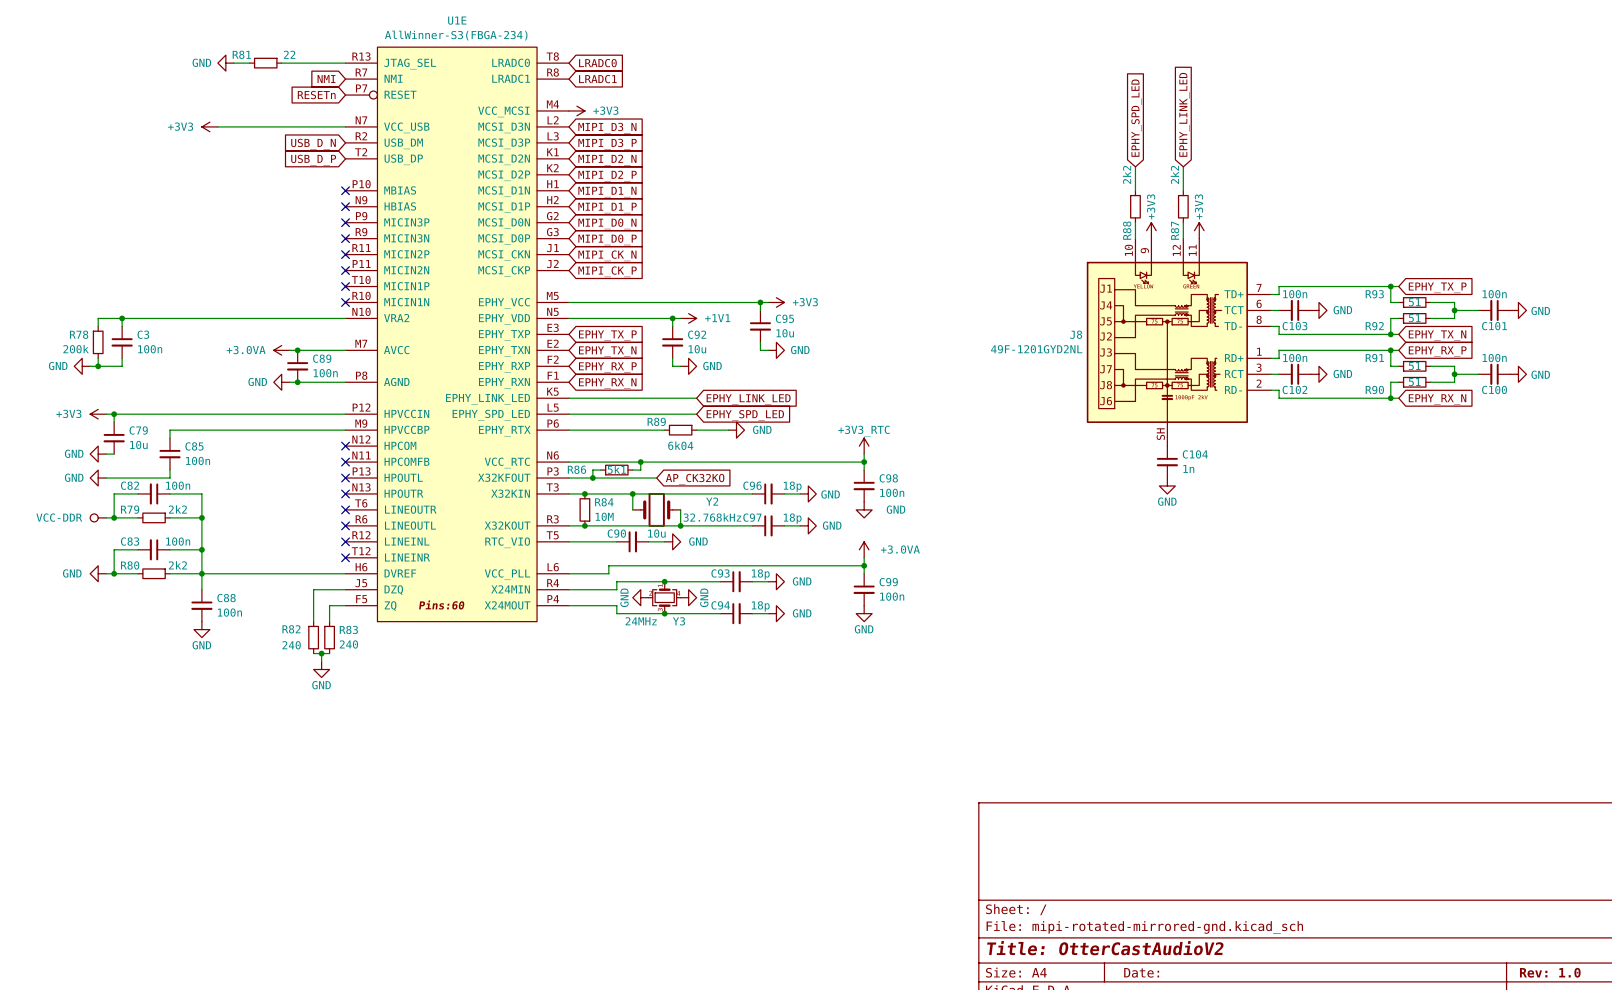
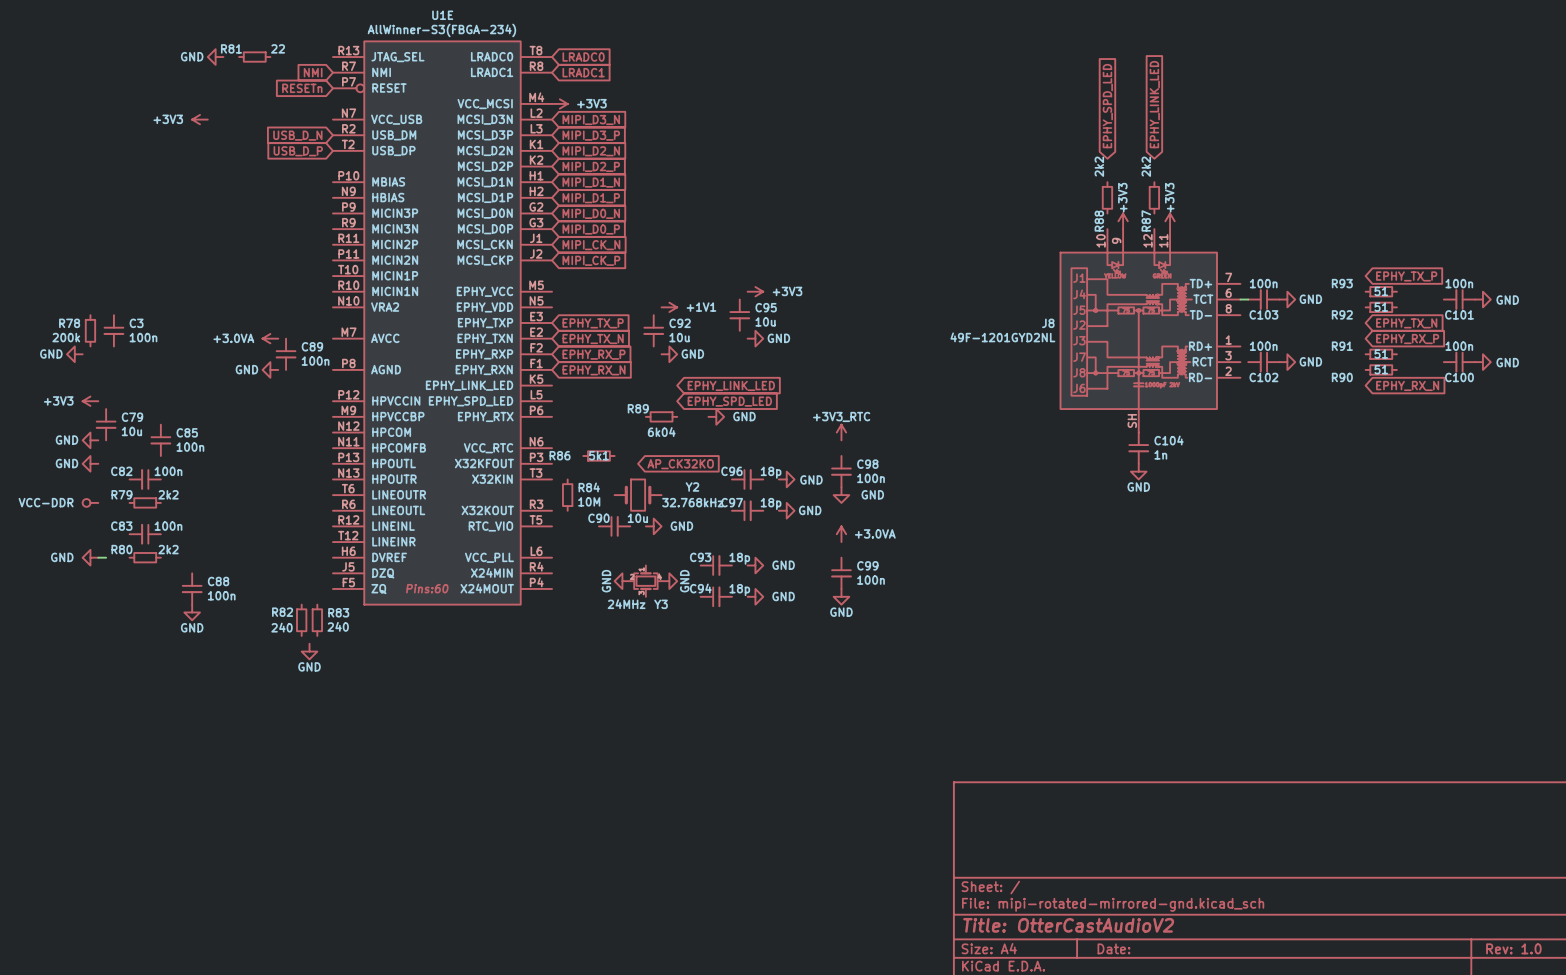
wire: (233, 63) (249, 63) -> none
wire: (281, 63) (345, 63) -> none
wire: (217, 126) (345, 126) -> none
wire: (1135, 166) (1135, 190) -> none
wire: (1183, 166) (1183, 190) -> none
no-connect mark: (345, 190) -> none
no-connect mark: (345, 206) -> none
no-connect mark: (345, 222) -> none
wire: (1135, 222) (1135, 238) -> none
wire: (1183, 222) (1183, 238) -> none
no-connect mark: (345, 238) -> none
no-connect mark: (345, 254) -> none
no-connect mark: (345, 270) -> none
no-connect mark: (345, 286) -> none
wire: (1390, 286) (1390, 302) (1398, 302) -> none
junction: (1390, 286) -> none
wire: (1398, 286) (1279, 286) (1279, 294) (1271, 294) -> none
no-connect mark: (345, 302) -> none
wire: (568, 302) (768, 302) -> none
wire: (760, 302) (760, 310) -> none
junction: (760, 302) -> none
wire: (1430, 302) (1454, 302) (1454, 318) (1430, 318) -> none
wire: (1454, 310) (1478, 310) -> none
junction: (1454, 310) -> none
wire: (122, 318) (122, 326) -> none
junction: (122, 318) -> none
wire: (345, 318) (98, 318) (98, 326) -> none
wire: (568, 318) (680, 318) -> none
wire: (672, 318) (672, 326) -> none
junction: (672, 318) -> none
wire: (1398, 318) (1390, 318) (1390, 334) -> none
wire: (1271, 326) (1279, 326) (1279, 334) (1398, 334) -> none
junction: (1390, 334) -> none
wire: (760, 342) (760, 350) (768, 350) -> none
wire: (289, 350) (345, 350) -> none
junction: (297, 350) -> none
wire: (1390, 350) (1390, 366) (1398, 366) -> none
junction: (1390, 350) -> none
wire: (1398, 350) (1279, 350) (1279, 358) (1271, 358) -> none
wire: (98, 358) (98, 366) -> none
wire: (122, 358) (122, 366) (90, 366) -> none
wire: (672, 358) (672, 366) (680, 366) -> none
junction: (98, 366) -> none
wire: (1430, 366) (1454, 366) (1454, 382) (1430, 382) -> none
wire: (1271, 374) (1279, 374) -> none
wire: (1454, 374) (1478, 374) -> none
junction: (1454, 374) -> none
wire: (289, 382) (345, 382) -> none
junction: (297, 382) -> none
wire: (1398, 382) (1390, 382) (1390, 398) -> none
wire: (1271, 390) (1279, 390) (1279, 398) (1398, 398) -> none
wire: (568, 398) (696, 398) -> none
junction: (1390, 398) -> none
wire: (106, 414) (345, 414) -> none
wire: (114, 414) (114, 422) -> none
junction: (114, 414) -> none
wire: (568, 414) (696, 414) -> none
wire: (345, 430) (170, 430) (170, 438) -> none
wire: (568, 430) (664, 430) -> none
wire: (696, 430) (728, 430) -> none
no-connect mark: (345, 446) -> none
wire: (106, 454) (114, 454) -> none
wire: (864, 454) (864, 470) -> none
no-connect mark: (345, 462) -> none
wire: (568, 462) (864, 462) -> none
wire: (640, 462) (640, 470) (632, 470) -> none
junction: (640, 462) -> none
junction: (864, 462) -> none
wire: (170, 470) (170, 478) (106, 478) -> none
wire: (600, 470) (592, 470) (592, 478) -> none
no-connect mark: (345, 478) -> none
wire: (568, 478) (656, 478) -> none
junction: (592, 478) -> none
wire: (138, 493) (114, 493) (114, 517) -> none
wire: (170, 493) (201, 493) (201, 589) -> none
no-connect mark: (345, 493) -> none
wire: (568, 493) (752, 493) -> none
junction: (584, 493) -> none
wire: (632, 493) (632, 509) -> none
junction: (632, 493) -> none
wire: (784, 493) (800, 493) -> none
no-connect mark: (345, 509) -> none
wire: (680, 509) (680, 525) -> none
wire: (106, 517) (138, 517) -> none
junction: (114, 517) -> none
wire: (170, 517) (201, 517) -> none
junction: (201, 517) -> none
no-connect mark: (345, 525) -> none
wire: (568, 525) (752, 525) -> none
junction: (584, 525) -> none
junction: (680, 525) -> none
wire: (784, 525) (800, 525) -> none
no-connect mark: (345, 541) -> none
wire: (568, 541) (616, 541) -> none
wire: (648, 541) (664, 541) -> none
wire: (138, 549) (114, 549) (114, 573) (138, 573) -> none
wire: (170, 549) (201, 549) -> none
junction: (201, 549) -> none
no-connect mark: (345, 557) -> none
wire: (864, 557) (864, 573) -> none
wire: (864, 565) (608, 565) (608, 573) (568, 573) -> none
junction: (864, 565) -> none
junction: (114, 573) -> none
wire: (170, 573) (345, 573) -> none
junction: (201, 573) -> none
junction: (664, 581) -> none
wire: (720, 581) (616, 581) (616, 589) (568, 589) -> none
wire: (752, 581) (768, 581) -> none
wire: (345, 589) (313, 589) (313, 621) -> none
wire: (345, 605) (329, 605) (329, 621) -> none
wire: (568, 605) (616, 605) (616, 613) (720, 613) -> none
junction: (664, 613) -> none
wire: (752, 613) (768, 613) -> none
wire: (313, 653) (329, 653) -> none
wire: (321, 653) (321, 661) -> none
junction: (321, 653) -> none

